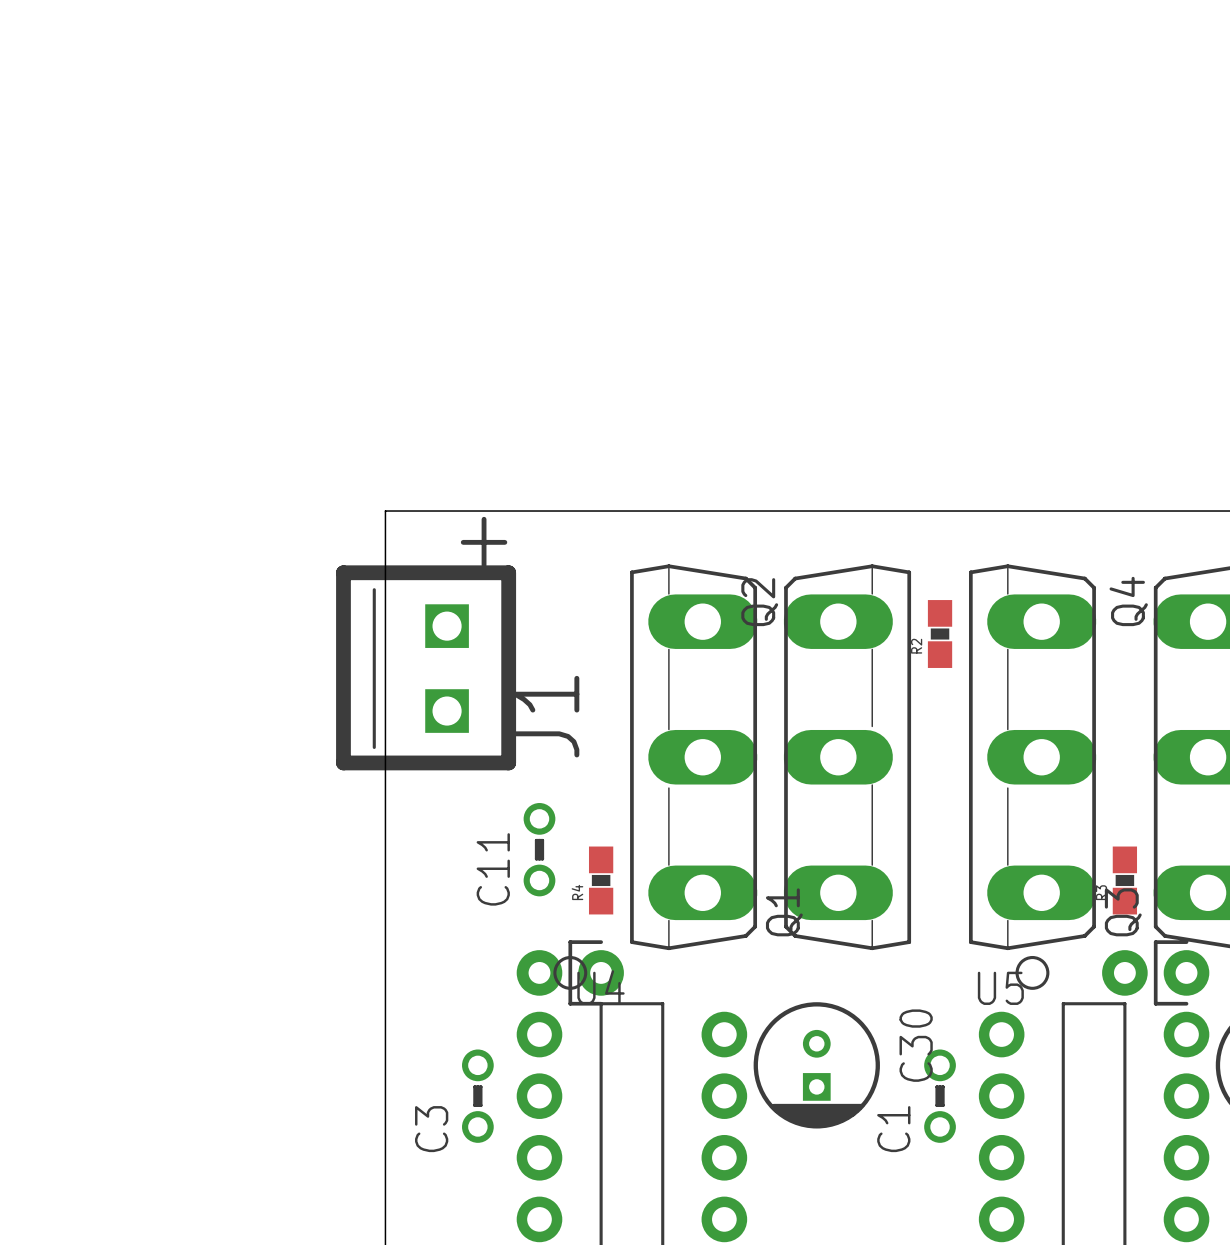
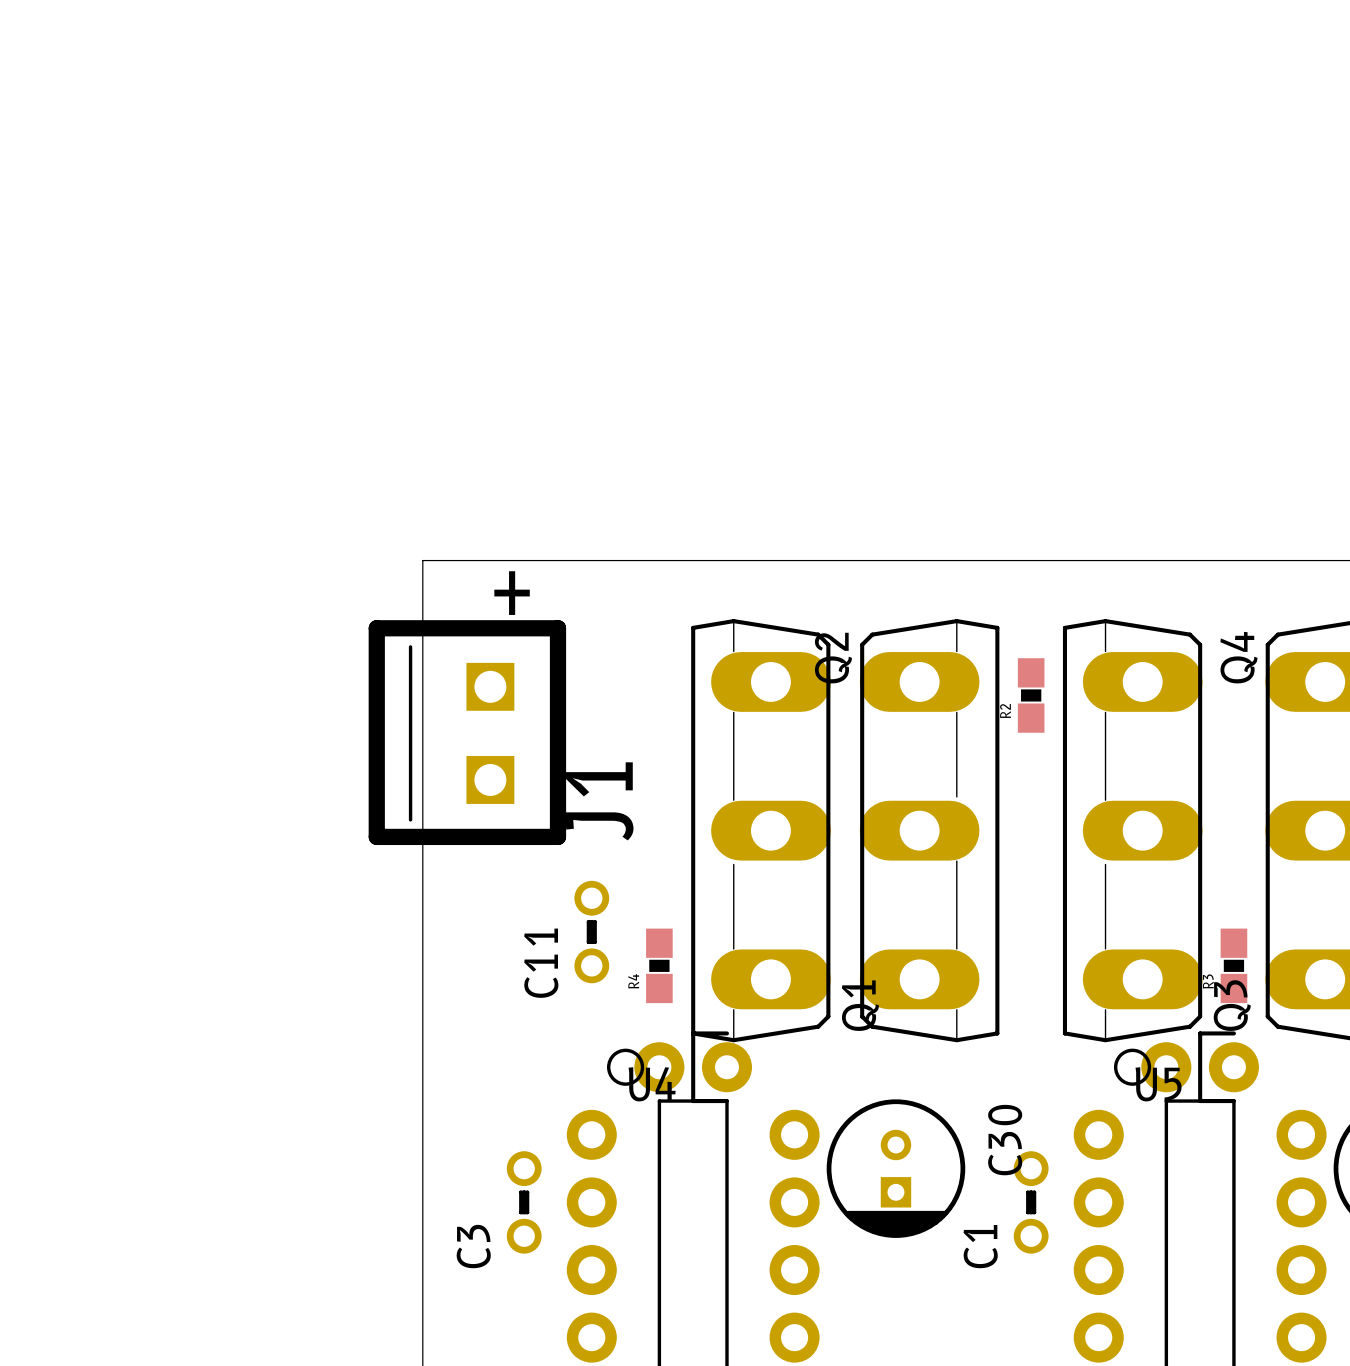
part position: (570, 972) -> (693, 1067)
part position: (1155, 972) -> (1200, 1067)
U5 name position: U5 (1000, 988) -> U5 (1158, 1084)

